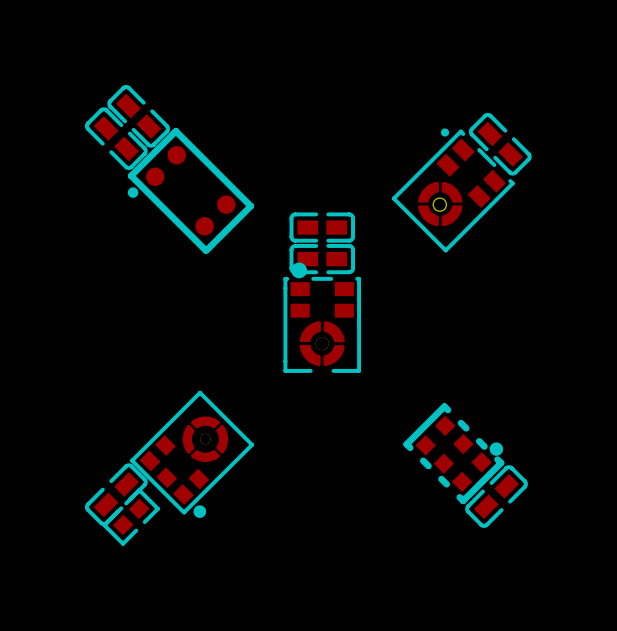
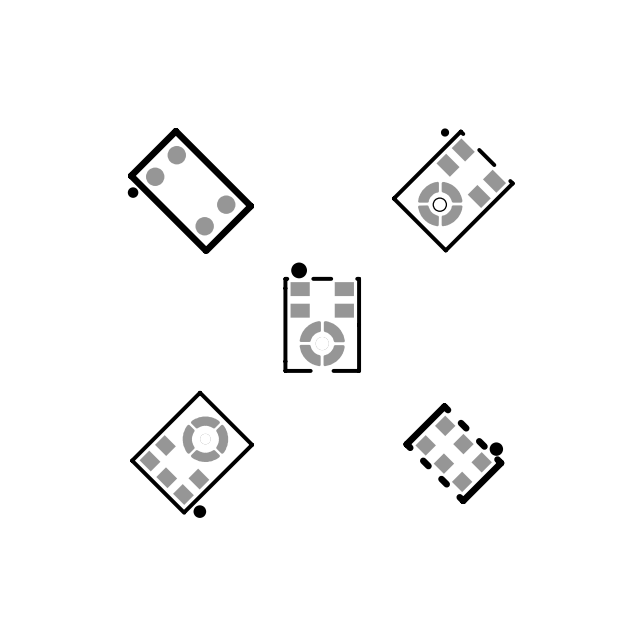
part: (138, 116) -> none
part: (116, 138) -> none
part: (500, 144) -> none
part: (322, 227) -> none
part: (322, 259) -> none
part: (116, 494) -> none
part: (496, 496) -> none
part: (131, 517) -> none

